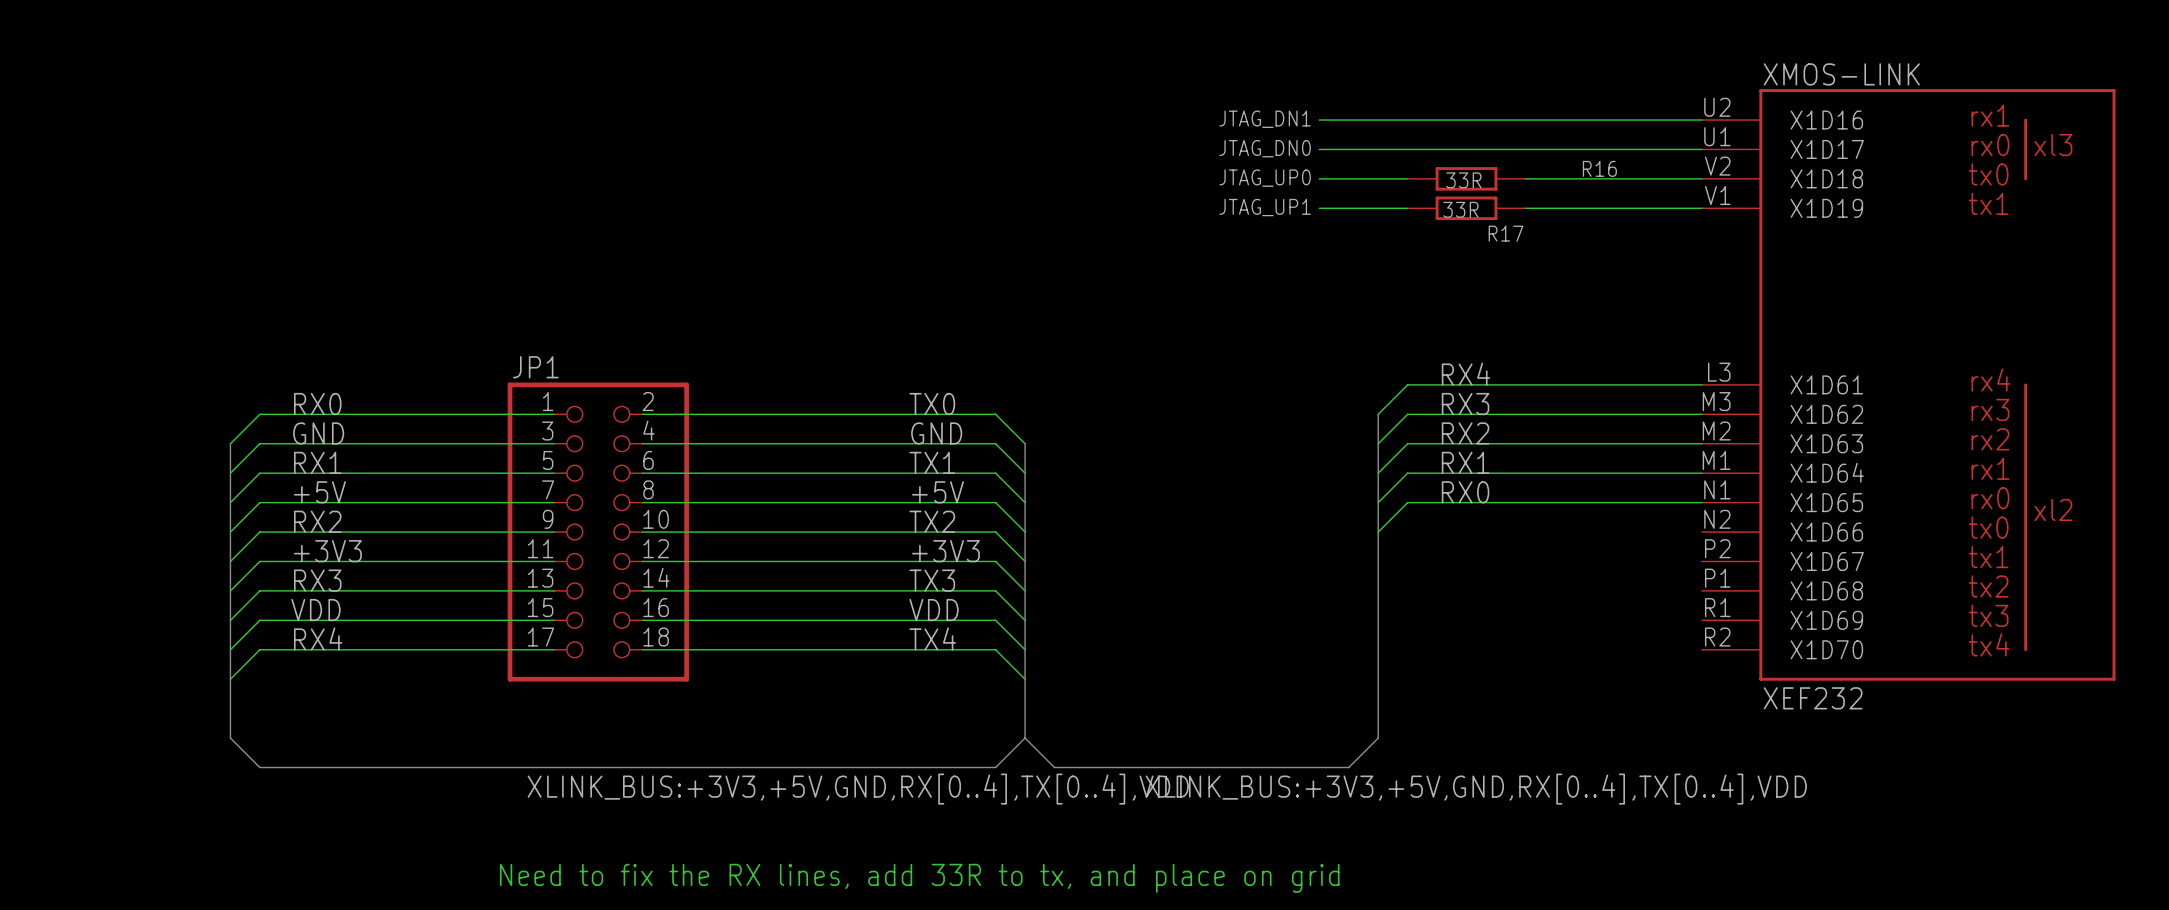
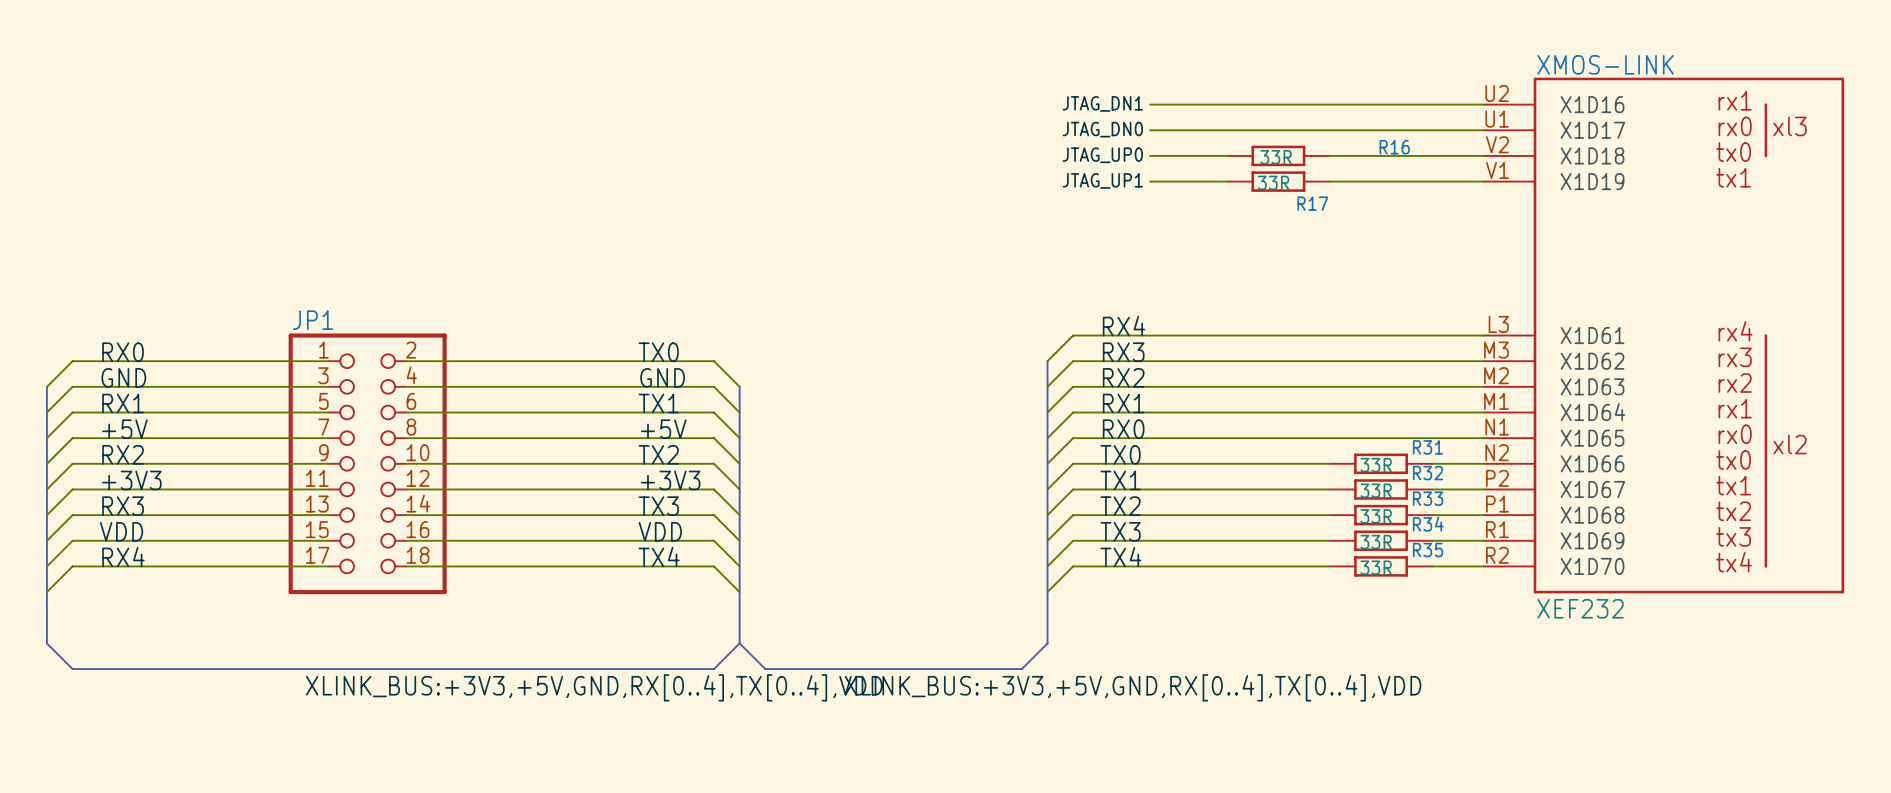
label position: RX4 (1465, 374) -> RX4 (1124, 326)
wire: (1407, 384) (1378, 414) -> (1227, 335) (1073, 335) (1047, 361)
label position: RX0 (317, 404) -> RX0 (123, 352)
label position: TX0 (932, 404) -> TX0 (658, 352)
label position: RX3 (1465, 404) -> RX3 (1123, 352)
wire: (259, 414) (230, 443) -> (226, 361) (72, 361) (46, 386)
wire: (377, 414) (465, 414) -> (483, 361) (560, 361)
wire: (819, 414) (995, 414) (1025, 443) -> (714, 361) (739, 386)
bus: (1378, 414) (1378, 738) (1348, 767) (1172, 767) -> (1047, 361) (1047, 643) (1021, 669)
wire: (1407, 414) (1378, 443) -> (1227, 361) (1073, 361) (1047, 386)
label position: GND (318, 433) -> GND (123, 377)
label position: GND (936, 433) -> GND (662, 377)
label position: RX2 (1465, 433) -> RX2 (1123, 377)
bus: (230, 443) (230, 738) (259, 767) -> (46, 386) (46, 643) (72, 669) (226, 669)
wire: (259, 443) (230, 473) -> (226, 386) (72, 386) (46, 412)
wire: (377, 443) (465, 443) -> (483, 386) (560, 386)
wire: (819, 443) (995, 443) (1025, 473) -> (714, 386) (739, 412)
bus: (1025, 443) (1025, 738) -> (739, 386) (739, 643)
wire: (1407, 443) (1378, 473) -> (1227, 386) (1073, 386) (1047, 412)
label position: RX1 (317, 462) -> RX1 (123, 403)
label position: TX1 (932, 462) -> TX1 (658, 403)
label position: RX1 (1465, 462) -> RX1 (1123, 403)
wire: (259, 473) (230, 502) -> (226, 412) (72, 412) (46, 438)
wire: (377, 473) (465, 473) -> (483, 412) (560, 412)
wire: (819, 473) (995, 473) (1025, 502) -> (714, 412) (739, 438)
wire: (1407, 473) (1378, 502) -> (1227, 412) (1073, 412) (1047, 438)
label position: +5V (319, 492) -> +5V (124, 429)
label position: +5V (938, 492) -> +5V (663, 429)
label position: RX0 (1465, 492) -> RX0 (1123, 429)
wire: (259, 502) (230, 532) -> (226, 438) (72, 438) (46, 463)
wire: (377, 502) (465, 502) -> (483, 438) (560, 438)
wire: (819, 502) (995, 502) (1025, 532) -> (714, 438) (739, 463)
wire: (1407, 502) (1378, 532) -> (1227, 438) (1073, 438) (1047, 463)
label position: RX2 (317, 521) -> RX2 (123, 454)
label position: TX2 (932, 521) -> TX2 (658, 454)
label: none -> TX0 (1120, 454)
wire: (259, 532) (230, 561) -> (226, 463) (72, 463) (46, 489)
wire: (377, 532) (465, 532) -> (483, 463) (560, 463)
JP1 position: (598, 532) -> (367, 463)
wire: (819, 532) (995, 532) (1025, 561) -> (714, 463) (739, 489)
wire: none -> (1329, 463) (1073, 463) (1047, 489)
R31: none -> 33R (1381, 463)
wire: none -> (1432, 463) (1483, 463)
label position: +3V3 (327, 551) -> +3V3 (131, 480)
label position: +3V3 (945, 551) -> +3V3 (670, 480)
label: none -> TX1 (1120, 480)
wire: (259, 561) (230, 590) -> (226, 489) (72, 489) (46, 515)
wire: (377, 561) (465, 561) -> (483, 489) (560, 489)
wire: (819, 561) (995, 561) (1025, 590) -> (714, 489) (739, 515)
wire: none -> (1329, 489) (1073, 489) (1047, 515)
R32: none -> 33R (1381, 489)
wire: none -> (1432, 489) (1483, 489)
label position: RX3 (317, 580) -> RX3 (123, 506)
label position: TX3 (932, 580) -> TX3 (658, 506)
label: none -> TX2 (1120, 506)
wire: (259, 590) (230, 620) -> (226, 515) (72, 515) (46, 540)
wire: (377, 590) (465, 590) -> (483, 515) (560, 515)
wire: (819, 590) (995, 590) (1025, 620) -> (714, 515) (739, 540)
wire: none -> (1329, 515) (1073, 515) (1047, 540)
R33: none -> 33R (1381, 515)
wire: none -> (1432, 515) (1483, 515)
label position: VDD (315, 610) -> VDD (121, 531)
label position: VDD (934, 610) -> VDD (660, 531)
label: none -> TX3 (1120, 531)
wire: (259, 620) (230, 649) -> (226, 540) (72, 540) (46, 566)
wire: (377, 620) (465, 620) -> (483, 540) (560, 540)
wire: (819, 620) (995, 620) (1025, 649) -> (714, 540) (739, 566)
wire: none -> (1329, 540) (1073, 540) (1047, 566)
R34: none -> 33R (1381, 540)
wire: none -> (1432, 540) (1483, 540)
label position: RX4 (318, 638) -> RX4 (123, 557)
label: none -> TX4 (659, 557)
label: TX4 (932, 638) -> none
label: none -> TX4 (1120, 557)
wire: (259, 649) (230, 679) -> (226, 566) (72, 566) (46, 592)
wire: (377, 649) (465, 649) -> (483, 566) (560, 566)
wire: (819, 649) (995, 649) (1025, 679) -> (714, 566) (739, 592)
wire: none -> (1329, 566) (1073, 566) (1047, 592)
R35: none -> 33R (1381, 566)
wire: none -> (1432, 566) (1483, 566)
bus: (1025, 738) (995, 767) -> (919, 669) (867, 669)
bus: (1025, 738) (1054, 767) -> (739, 643) (765, 669)
bus: (819, 767) (877, 767) -> (714, 669) (739, 643)
label position: XLINK_BUS:+3V3,+5V,GND,RX[0..4],TX[0..4],VDD (858, 789) -> XLINK_BUS:+3V3,+5V,GND,RX[0..4],TX[0..4],VDD (594, 687)
label position: XLINK_BUS:+3V3,+5V,GND,RX[0..4],TX[0..4],VDD (1476, 789) -> XLINK_BUS:+3V3,+5V,GND,RX[0..4],TX[0..4],VDD (1133, 687)
text: Need to fix the RX lines, add 33R to tx, and place on grid (919, 878) -> none

